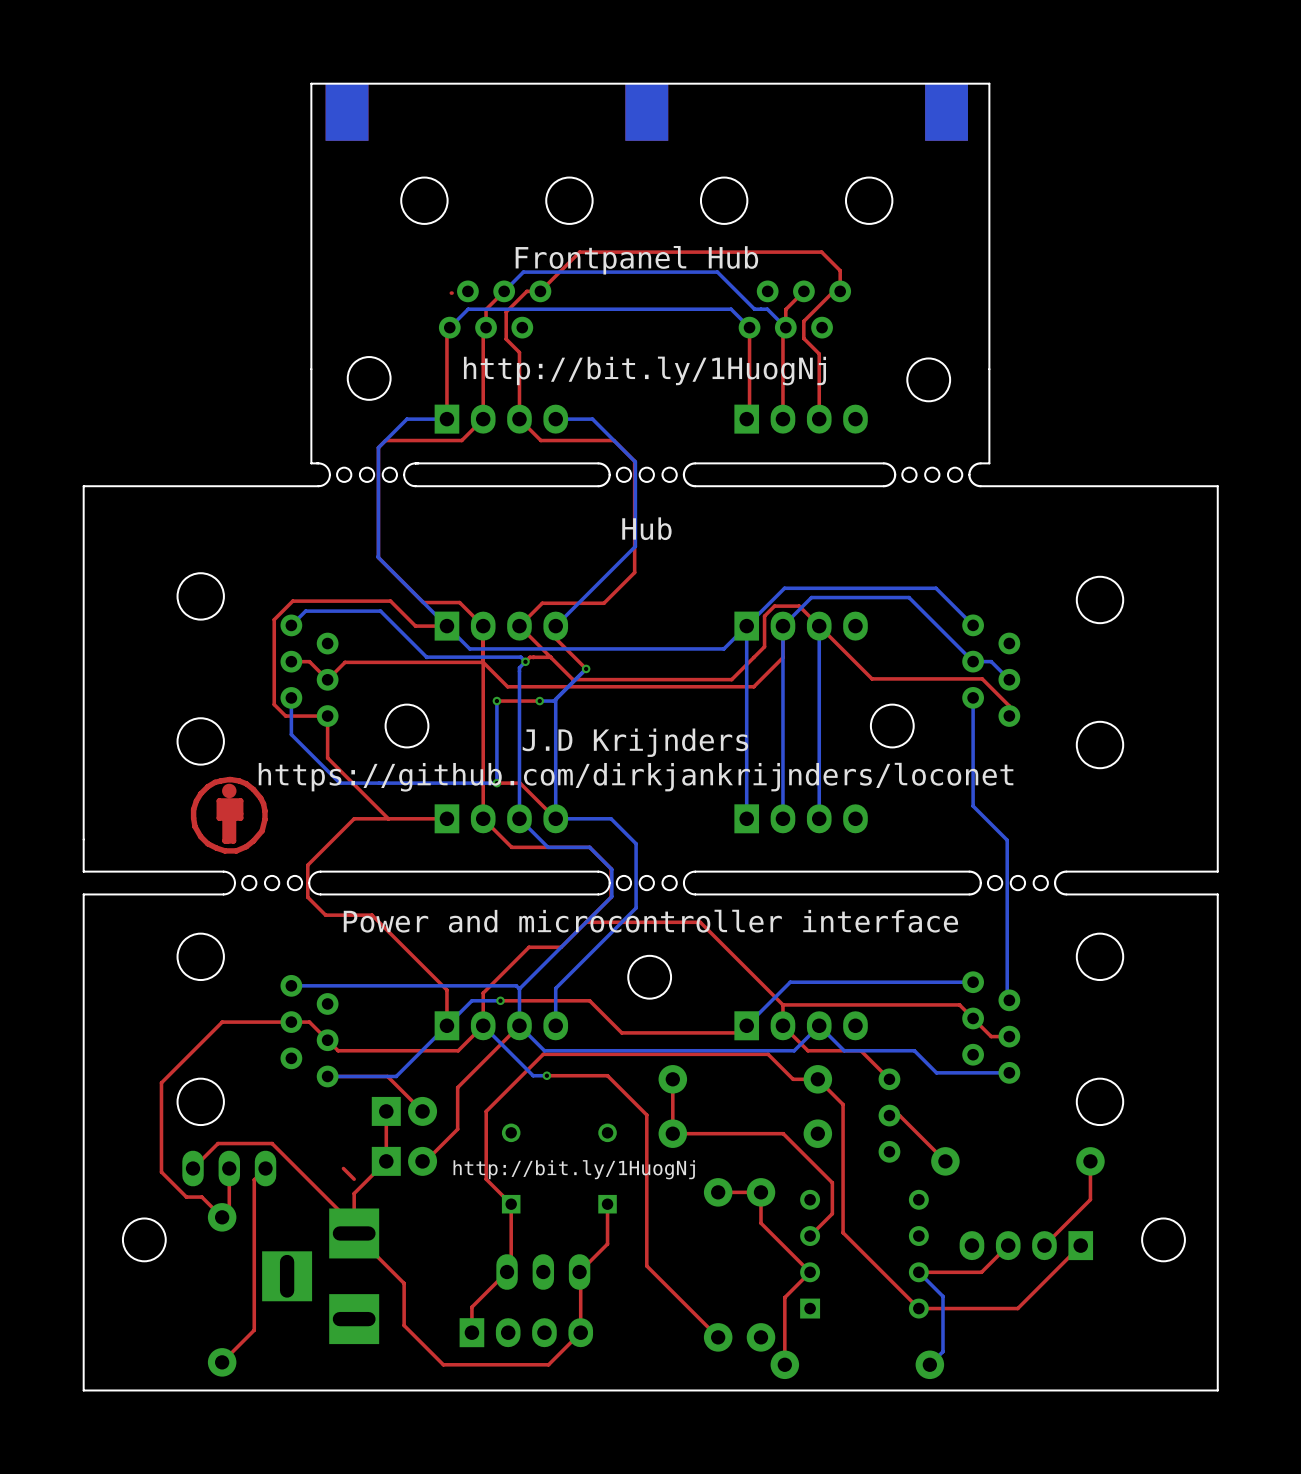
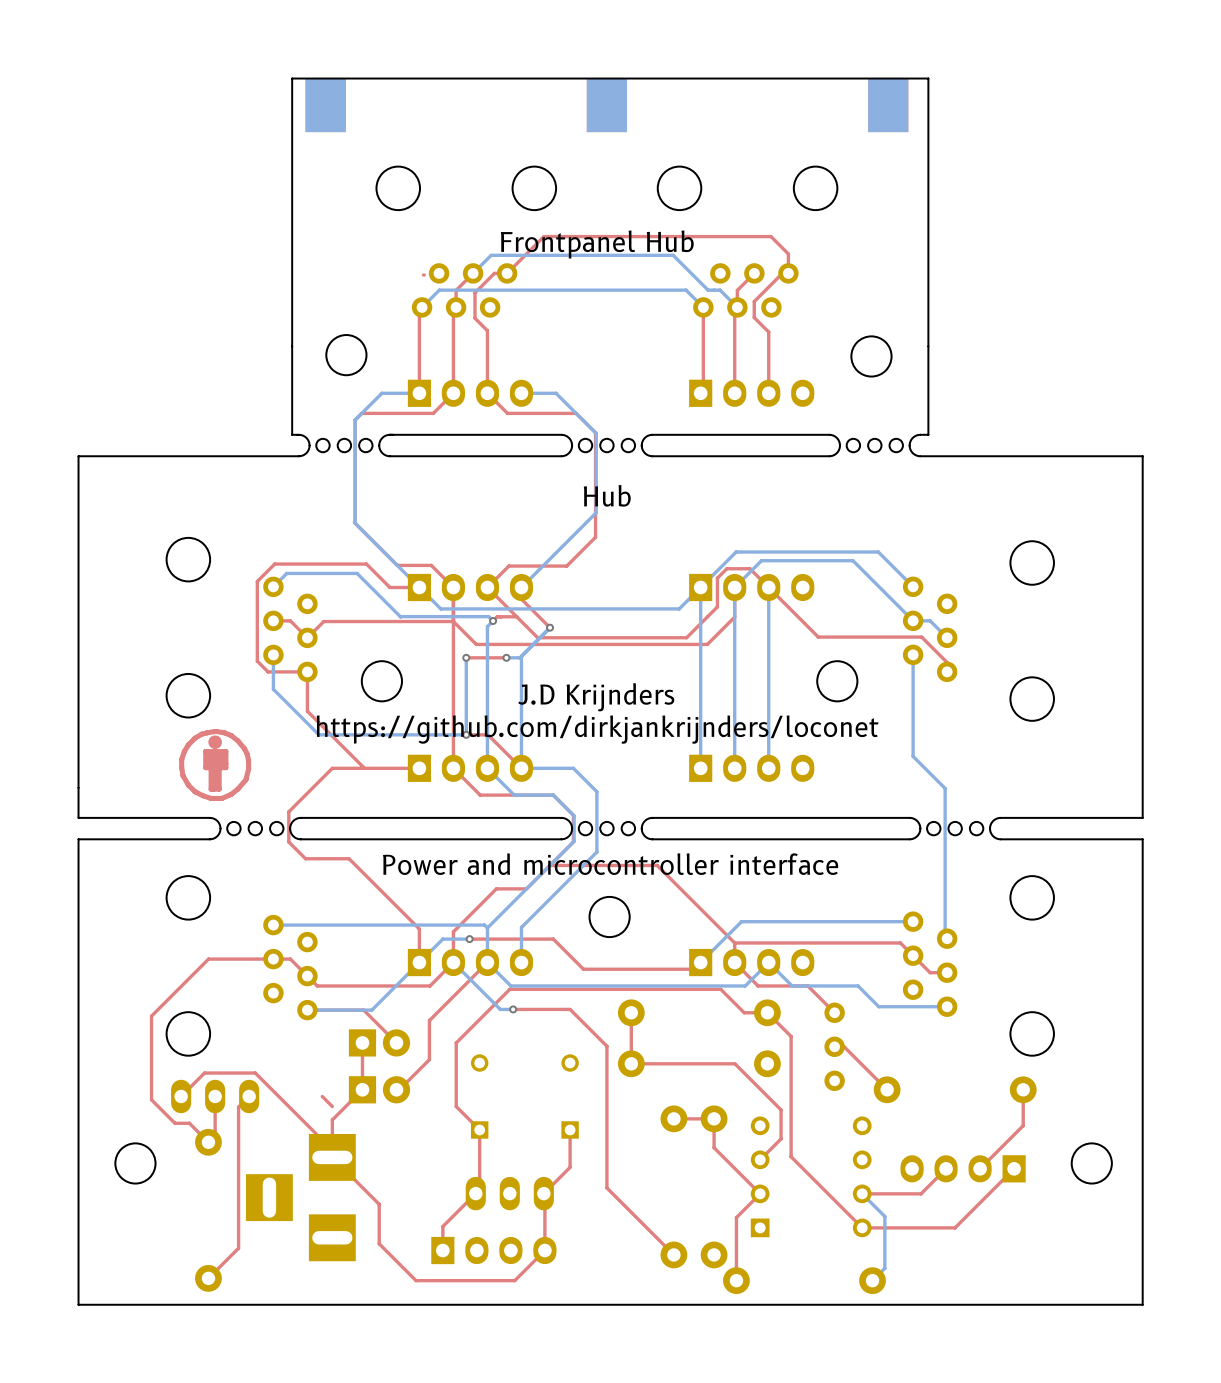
text: http://bit.ly/1HuogNj (644, 370) -> none
text: http://bit.ly/1HuogNj (574, 1169) -> none

